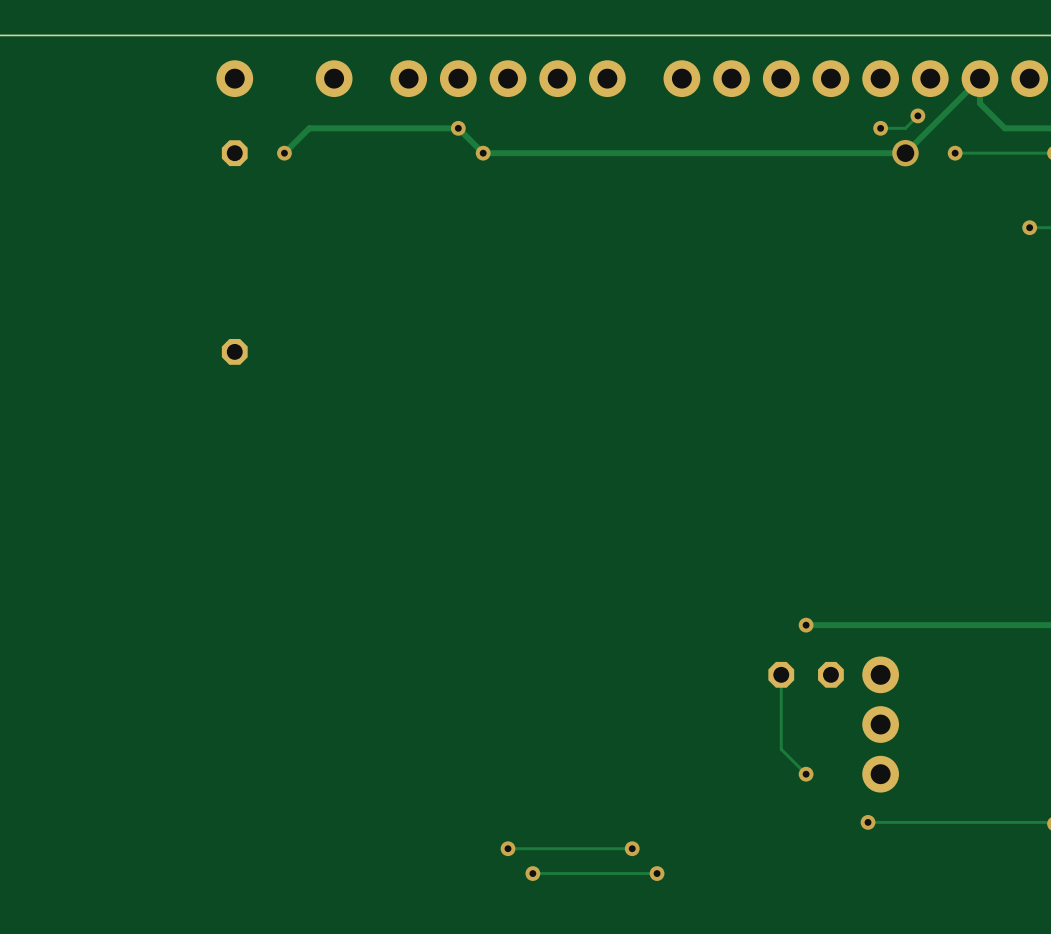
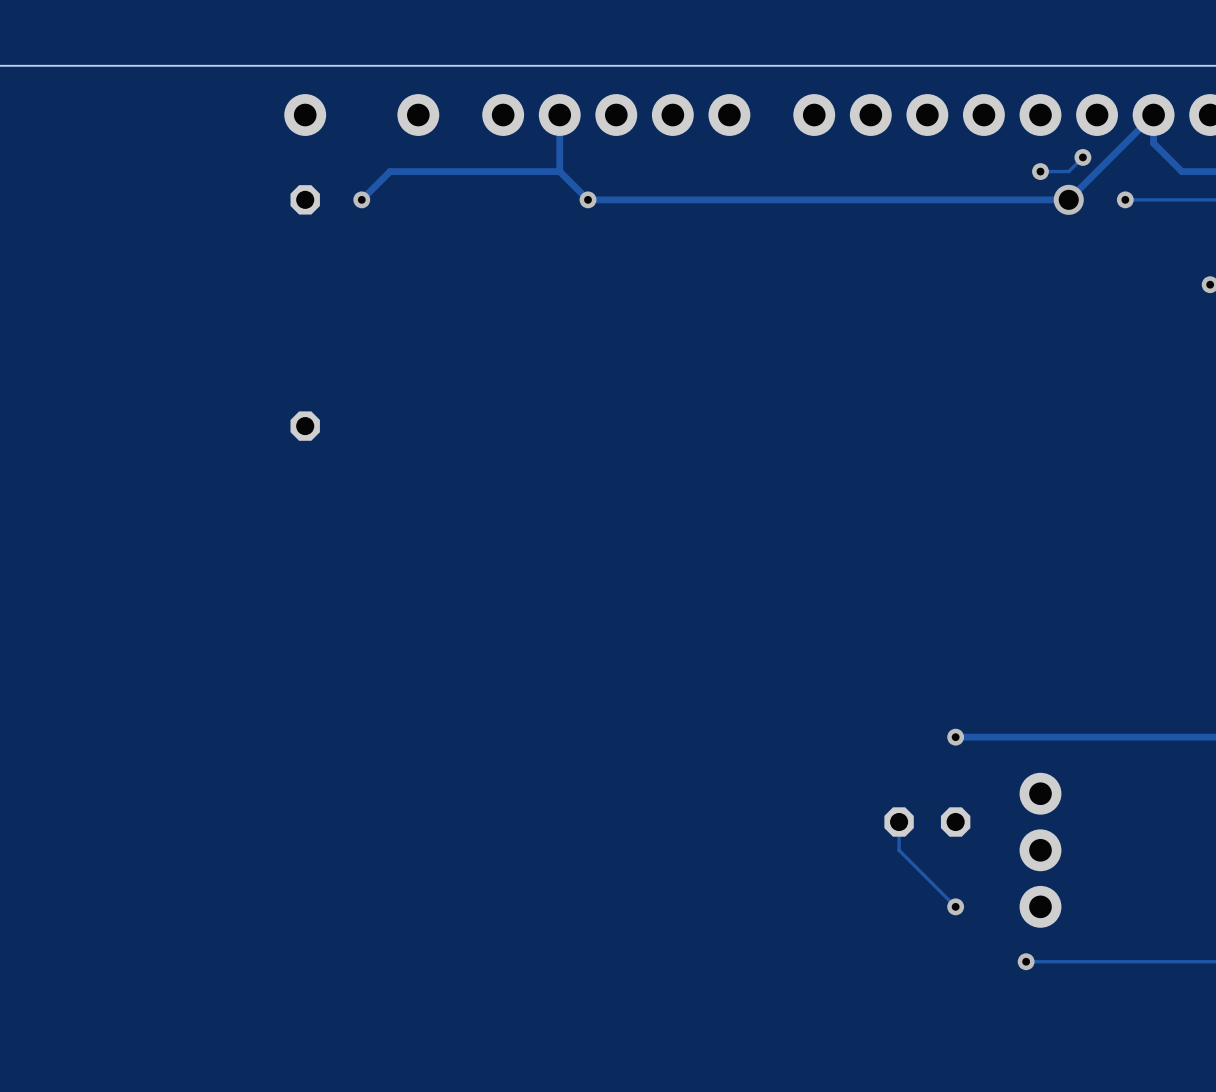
track: none -> (559, 115) (559, 171)
via: (458, 128) -> none
track: (781, 674) (781, 749) -> (899, 822) (899, 850) (927, 878)
part position: (806, 674) -> (927, 822)
via: (508, 848) -> none
track: (632, 848) (508, 848) -> none
via: (632, 848) -> none
via: (532, 873) -> none
track: (657, 873) (532, 873) -> none
via: (657, 873) -> none

